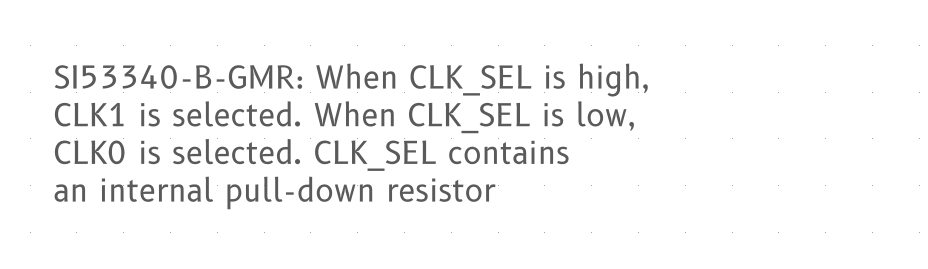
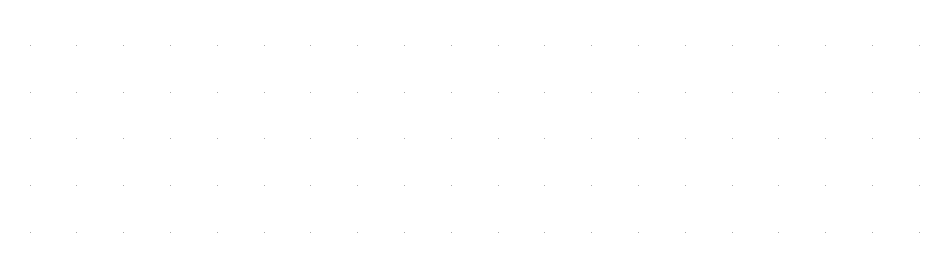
text: SI53340-B-GMR: When CLK_SEL is high, (351, 80) -> none
text: CLK1 is selected. When CLK_SEL is low, (344, 117) -> none
text: CLK0 is selected. CLK_SEL contains (311, 154) -> none
text: an internal pull-down resistor (274, 192) -> none

